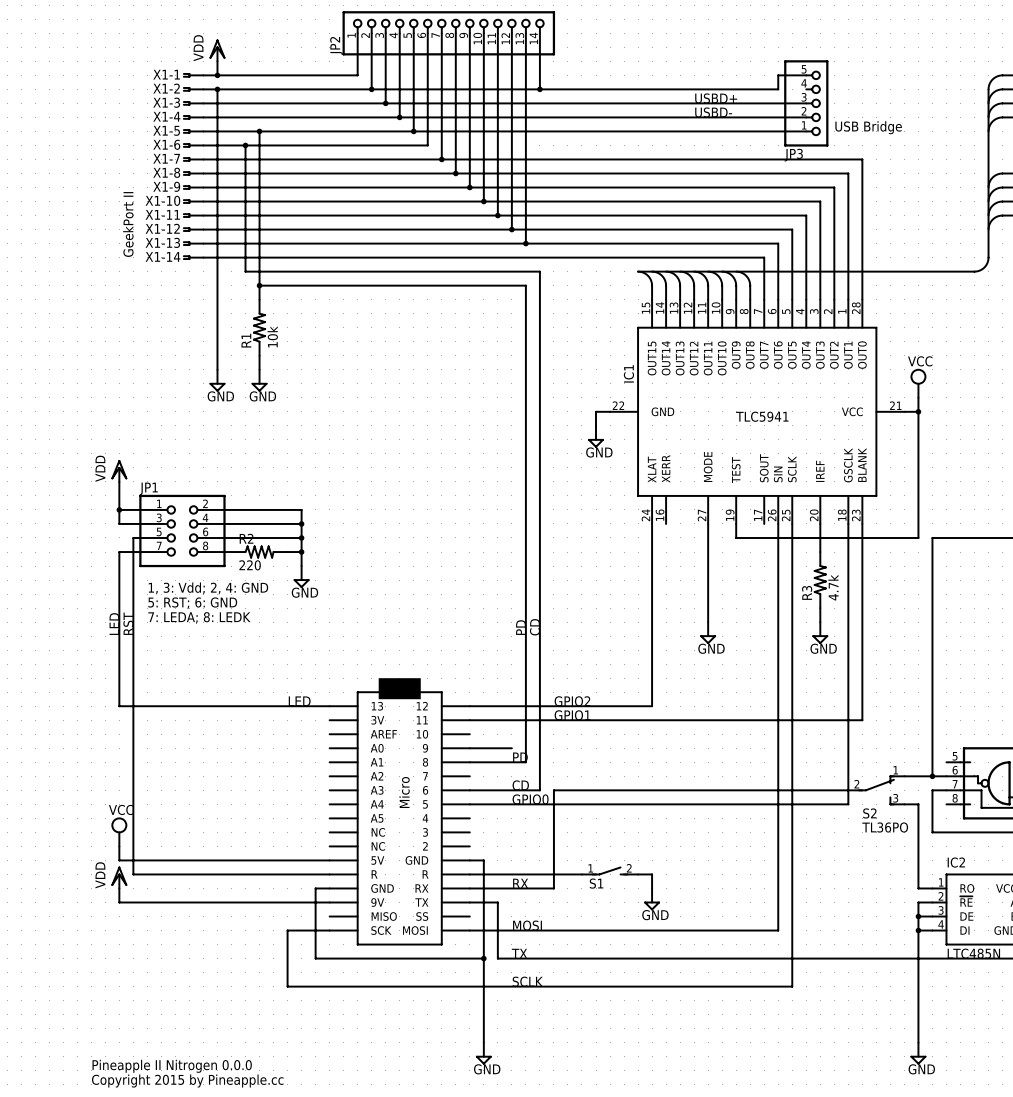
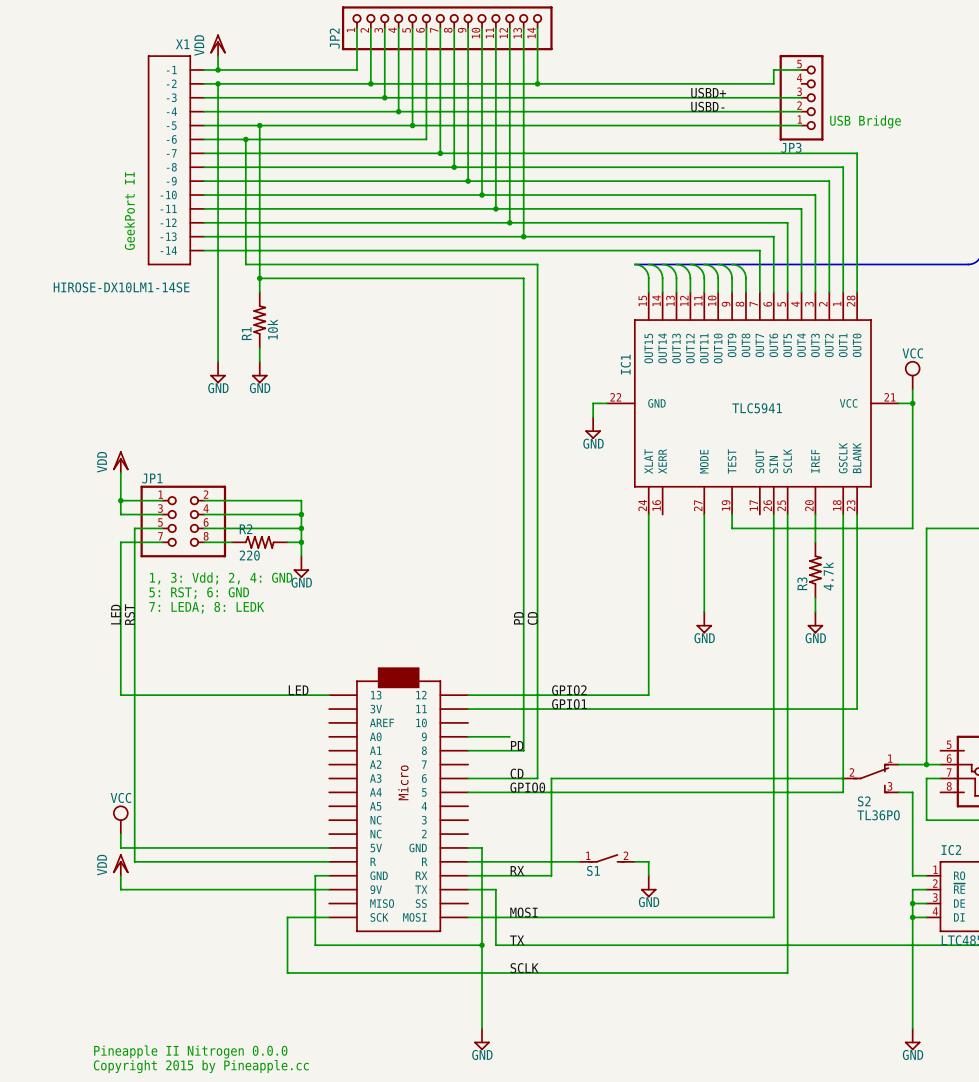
X1-1: (193, 75) -> none
X1-2: (193, 89) -> none
X1-3: (193, 103) -> none
X1-4: (193, 117) -> none
X1-5: (193, 131) -> none
X1-6: (193, 145) -> none
X1-7: (193, 159) -> none
X1: none -> HIROSE-DX10LM1-14SE (176, 160)
X1-8: (193, 173) -> none
X1-9: (193, 187) -> none
X1-10: (193, 201) -> none
X1-11: (193, 215) -> none
X1-12: (193, 229) -> none
X1-13: (193, 243) -> none
X1-14: (193, 257) -> none

